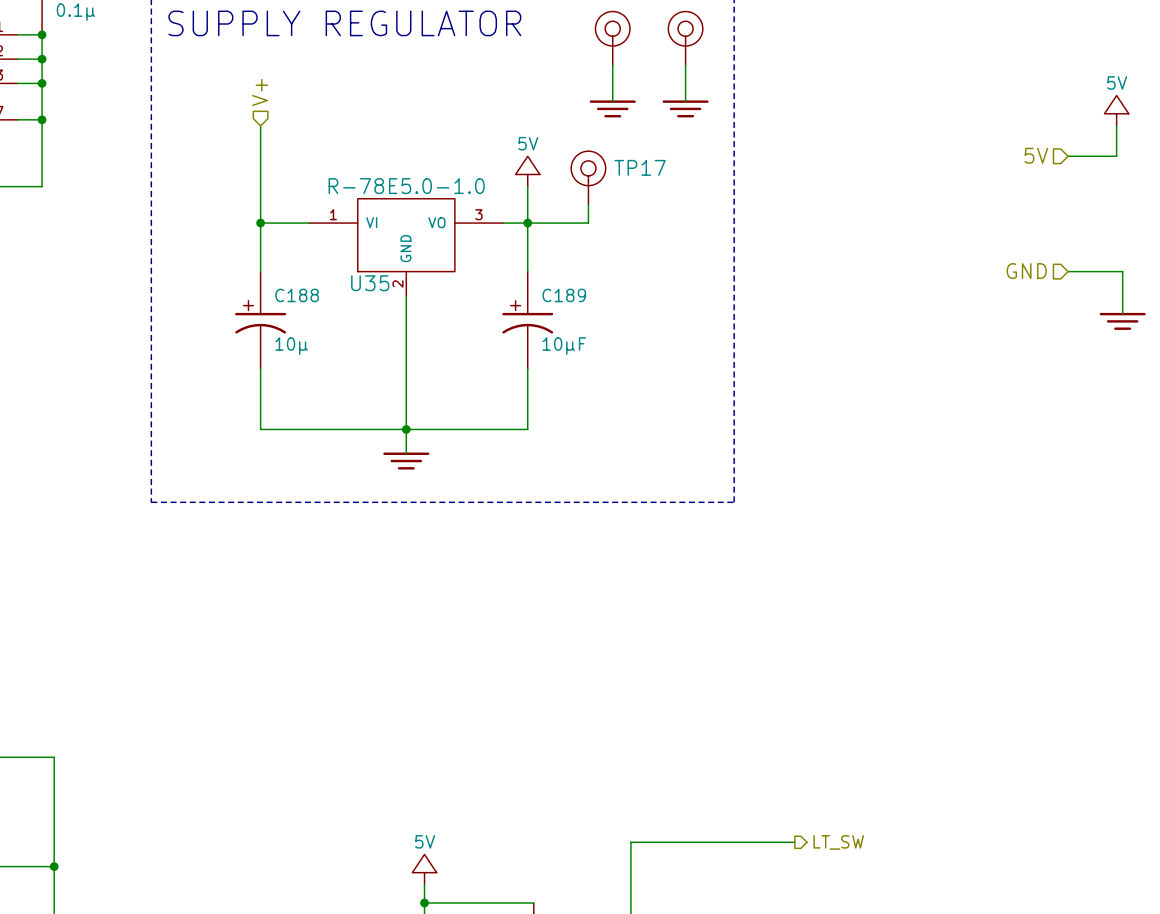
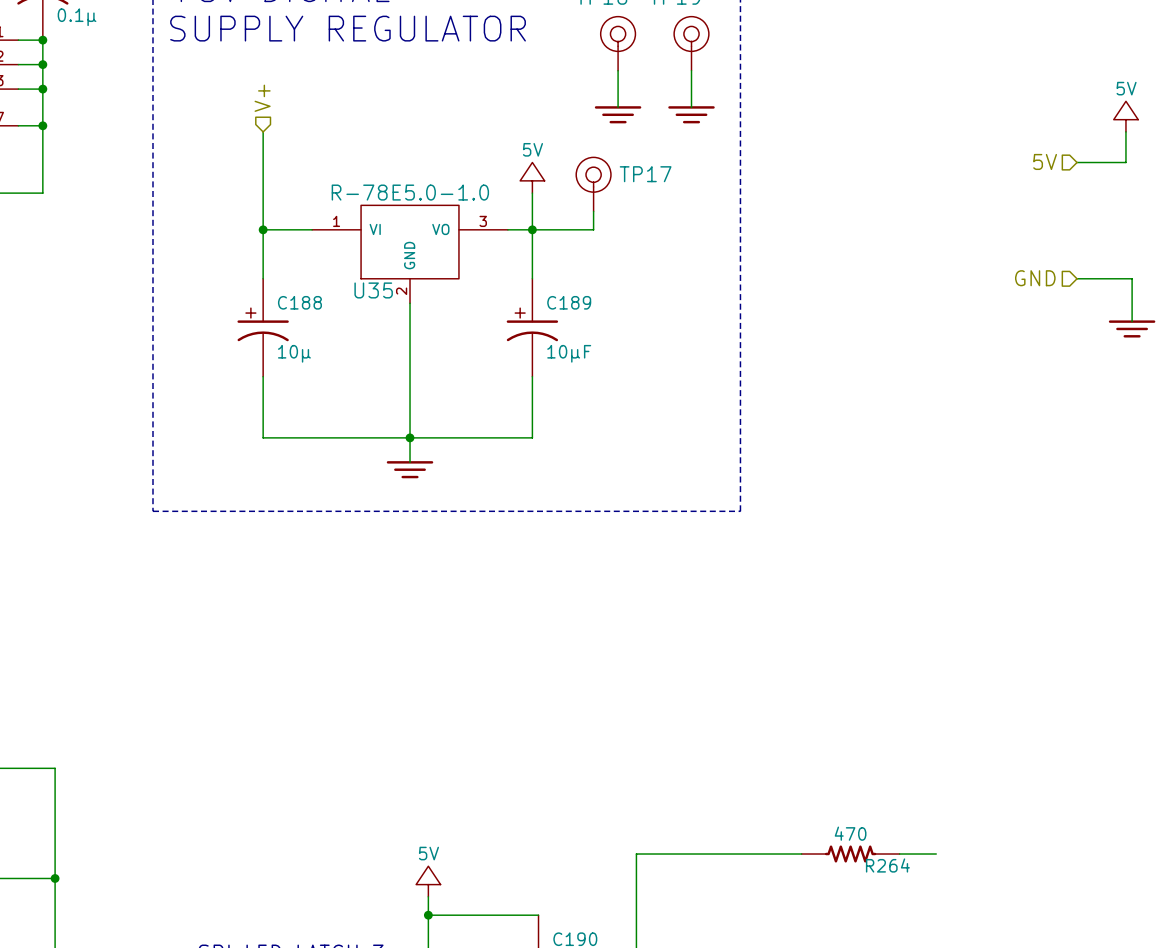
hierarchical label: LT_SW (838, 842) -> none
R264: none -> 470 (850, 854)
wire: none -> (899, 854) (936, 854)

